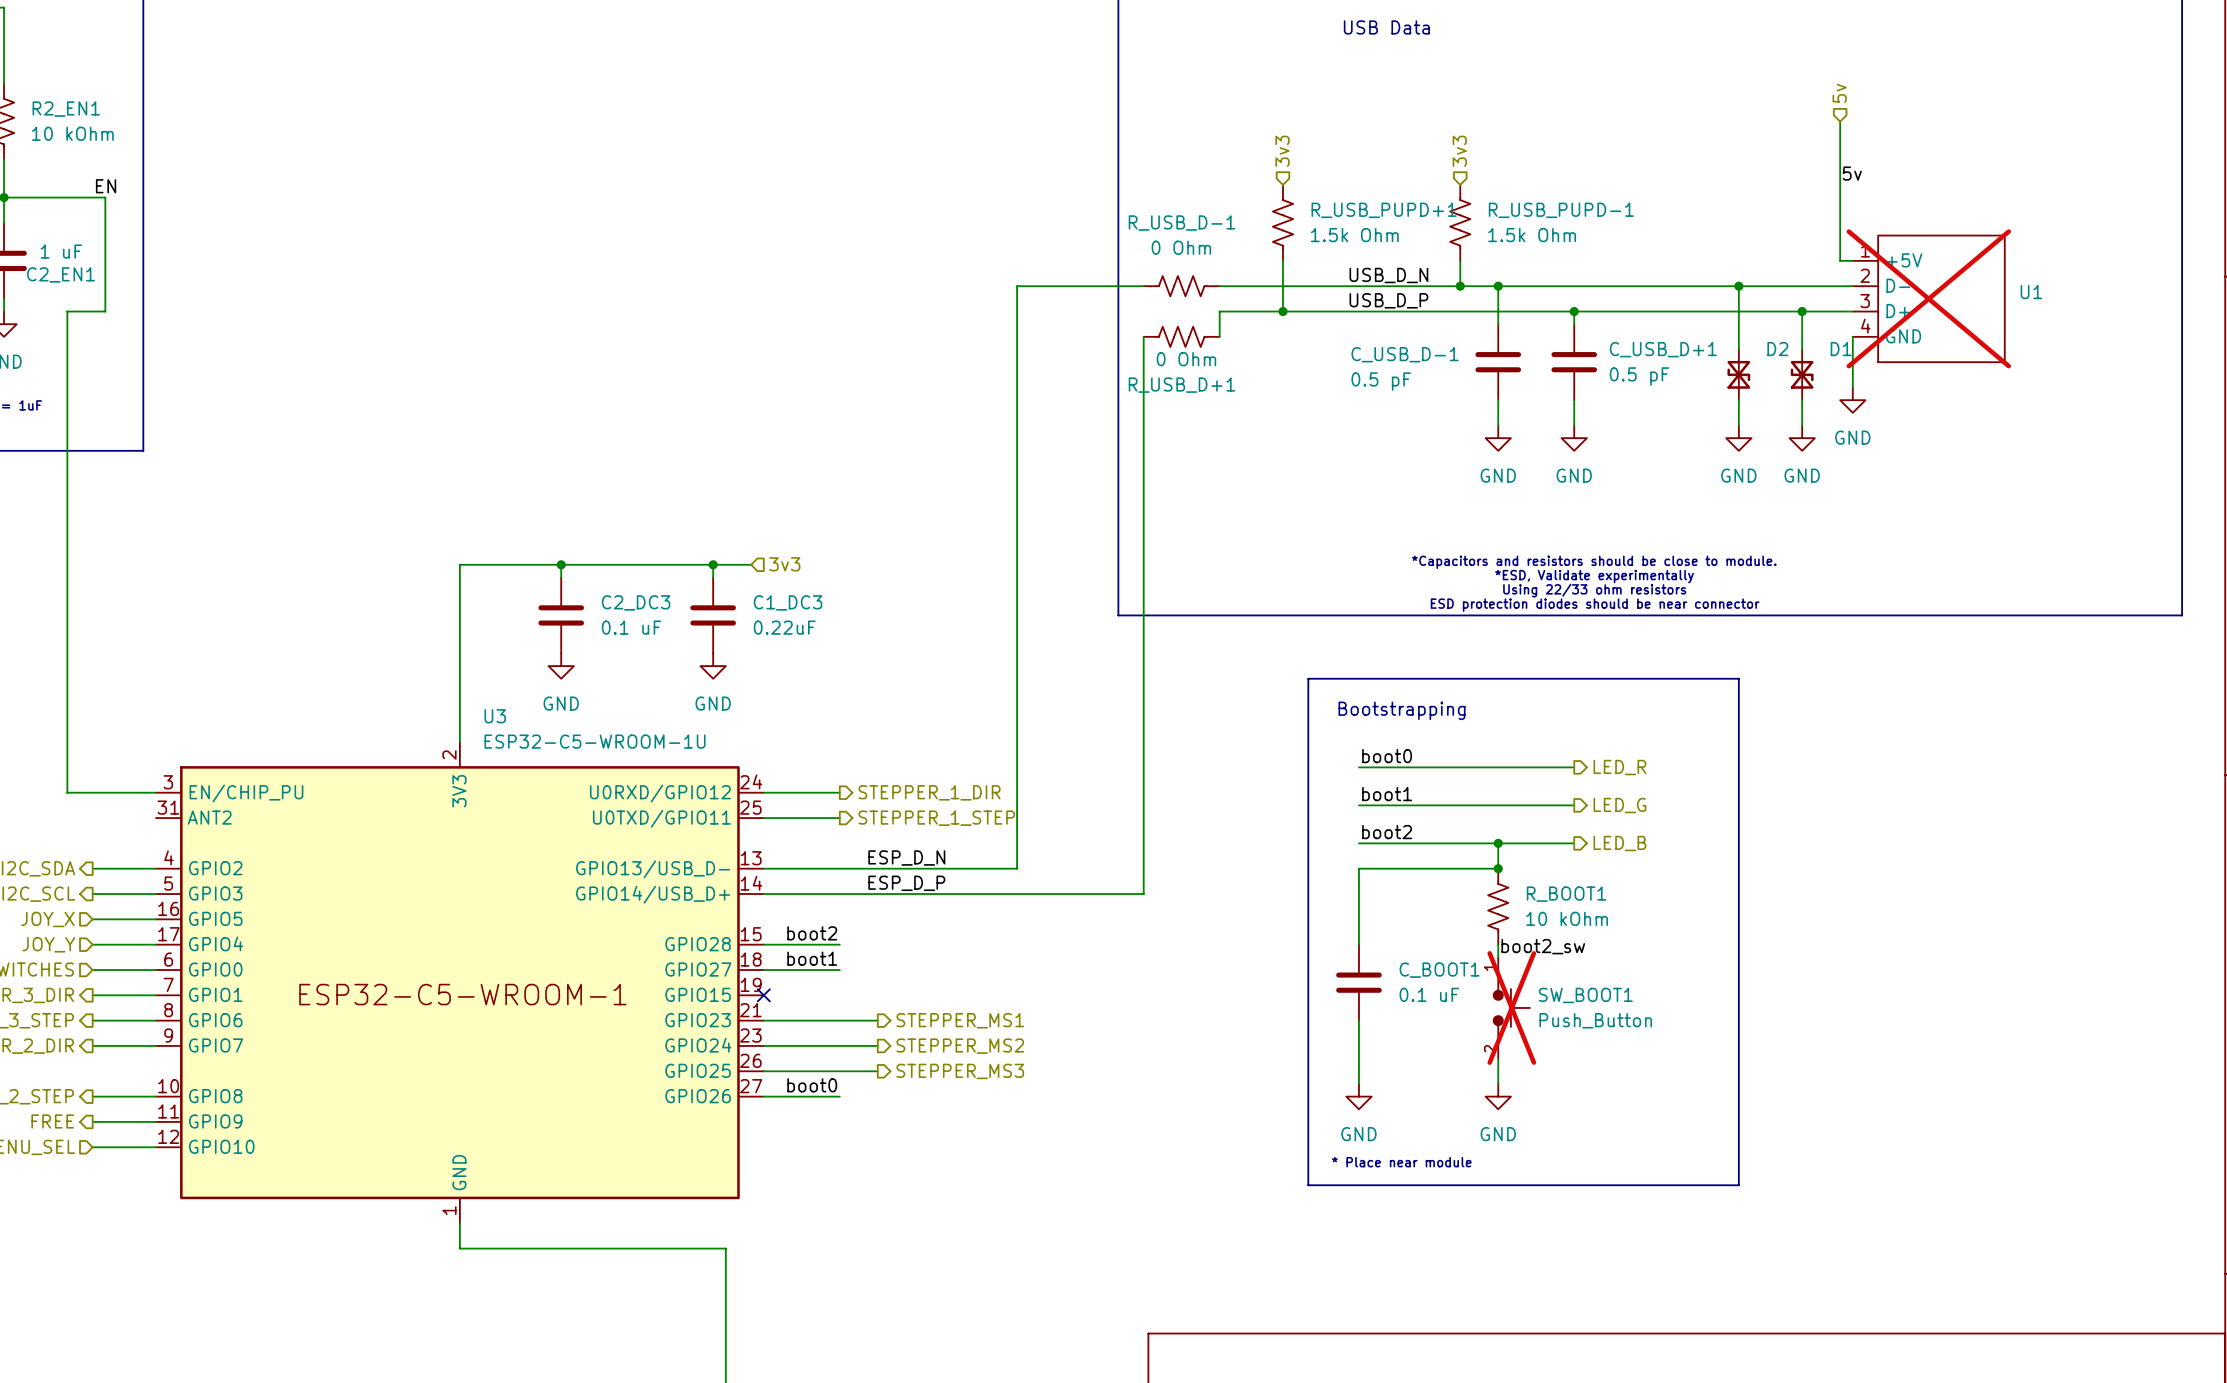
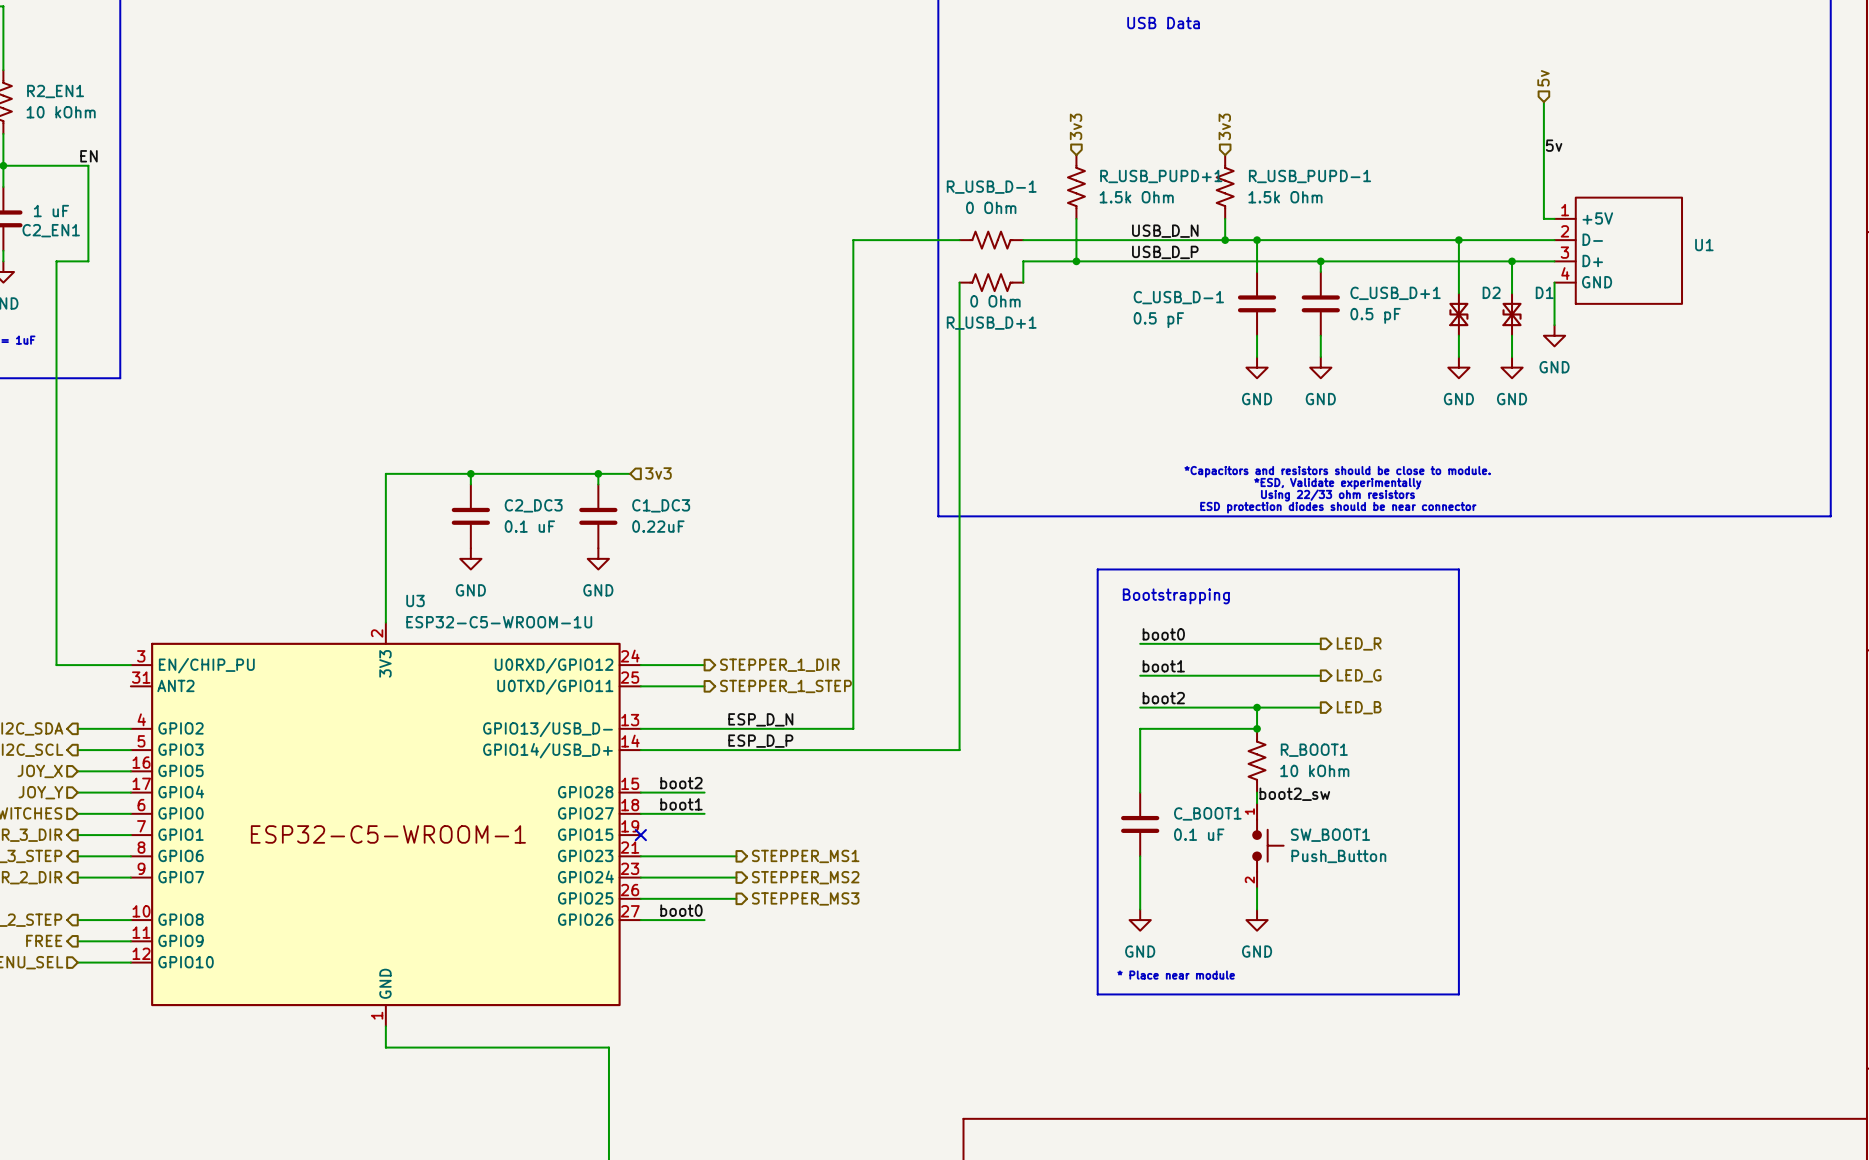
U1 do-not-place cross: (1928, 298) -> none
SW_BOOT1 do-not-place cross: (1511, 1007) -> none

